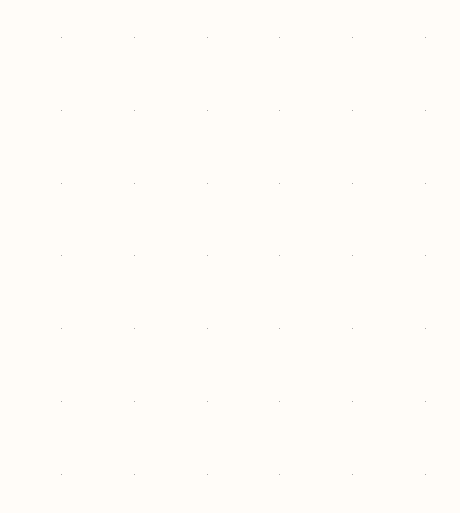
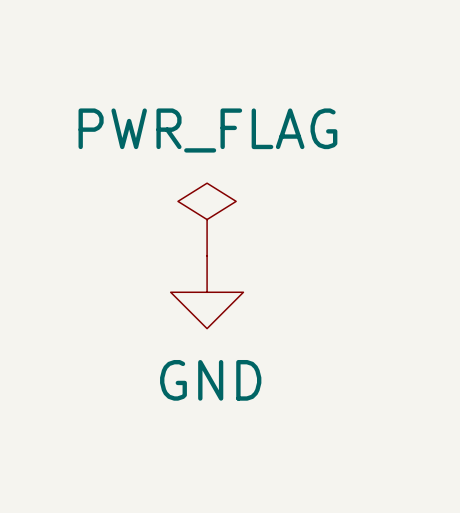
power symbol: none -> PWR_FLAG (207, 219)
power symbol: none -> GND (207, 292)

